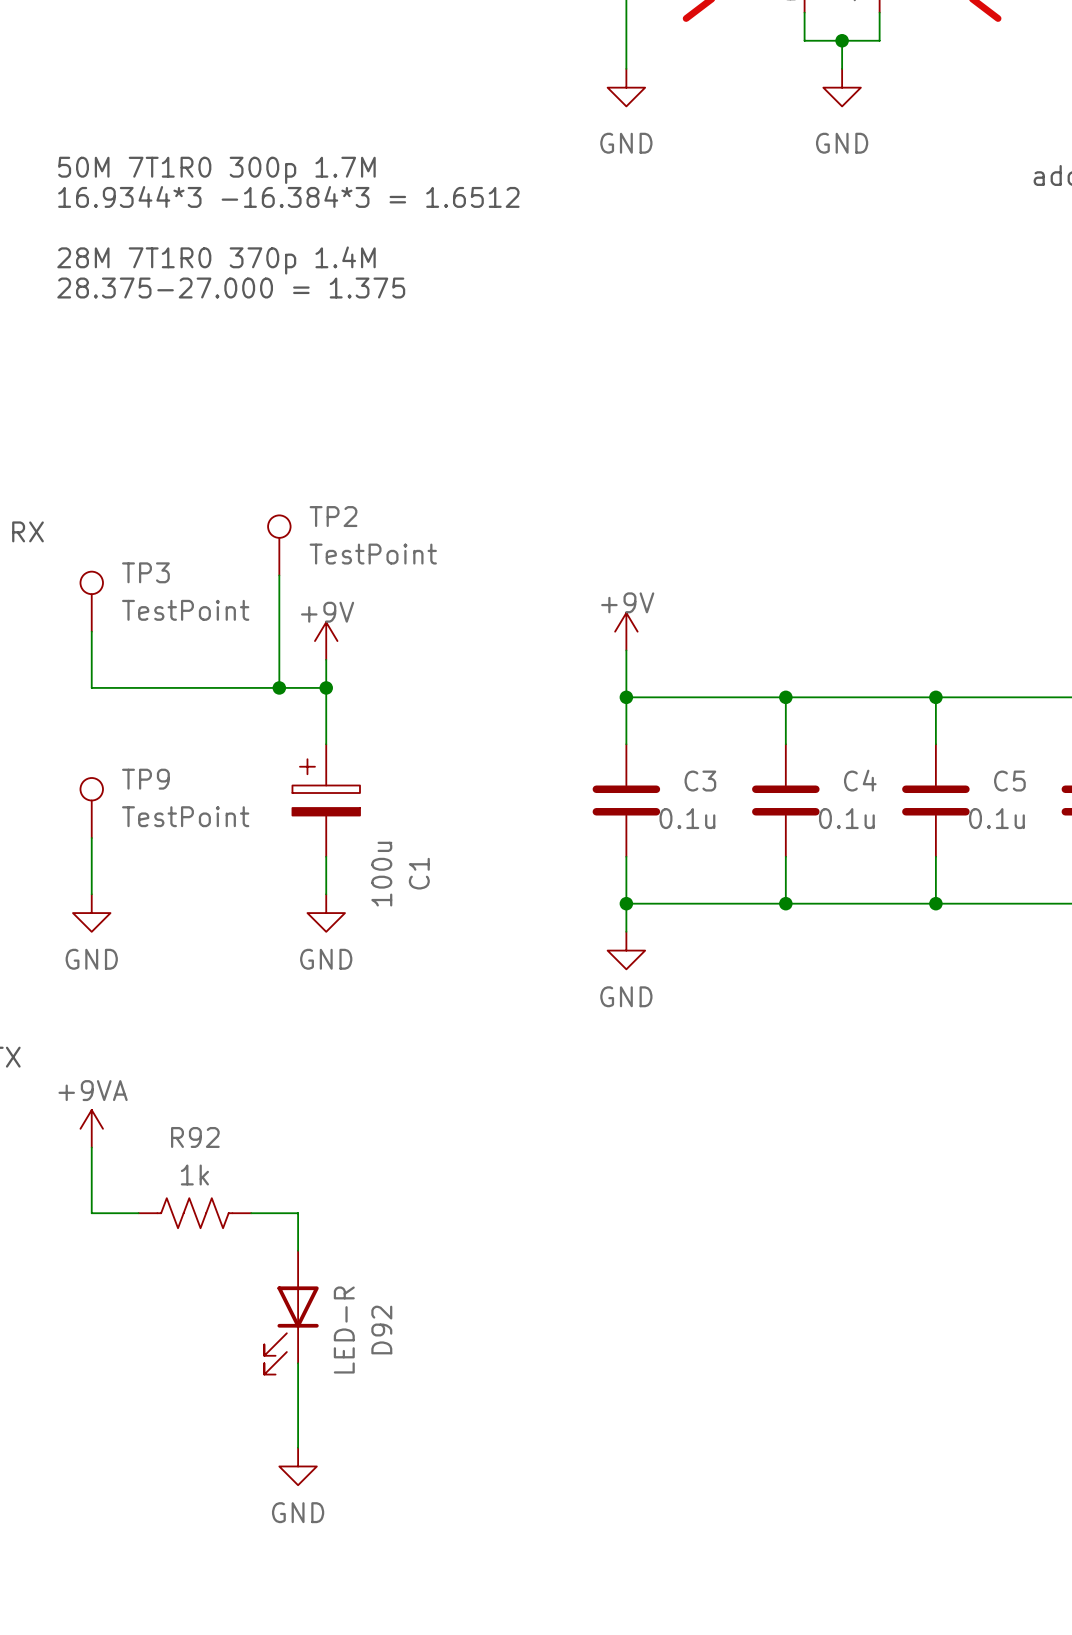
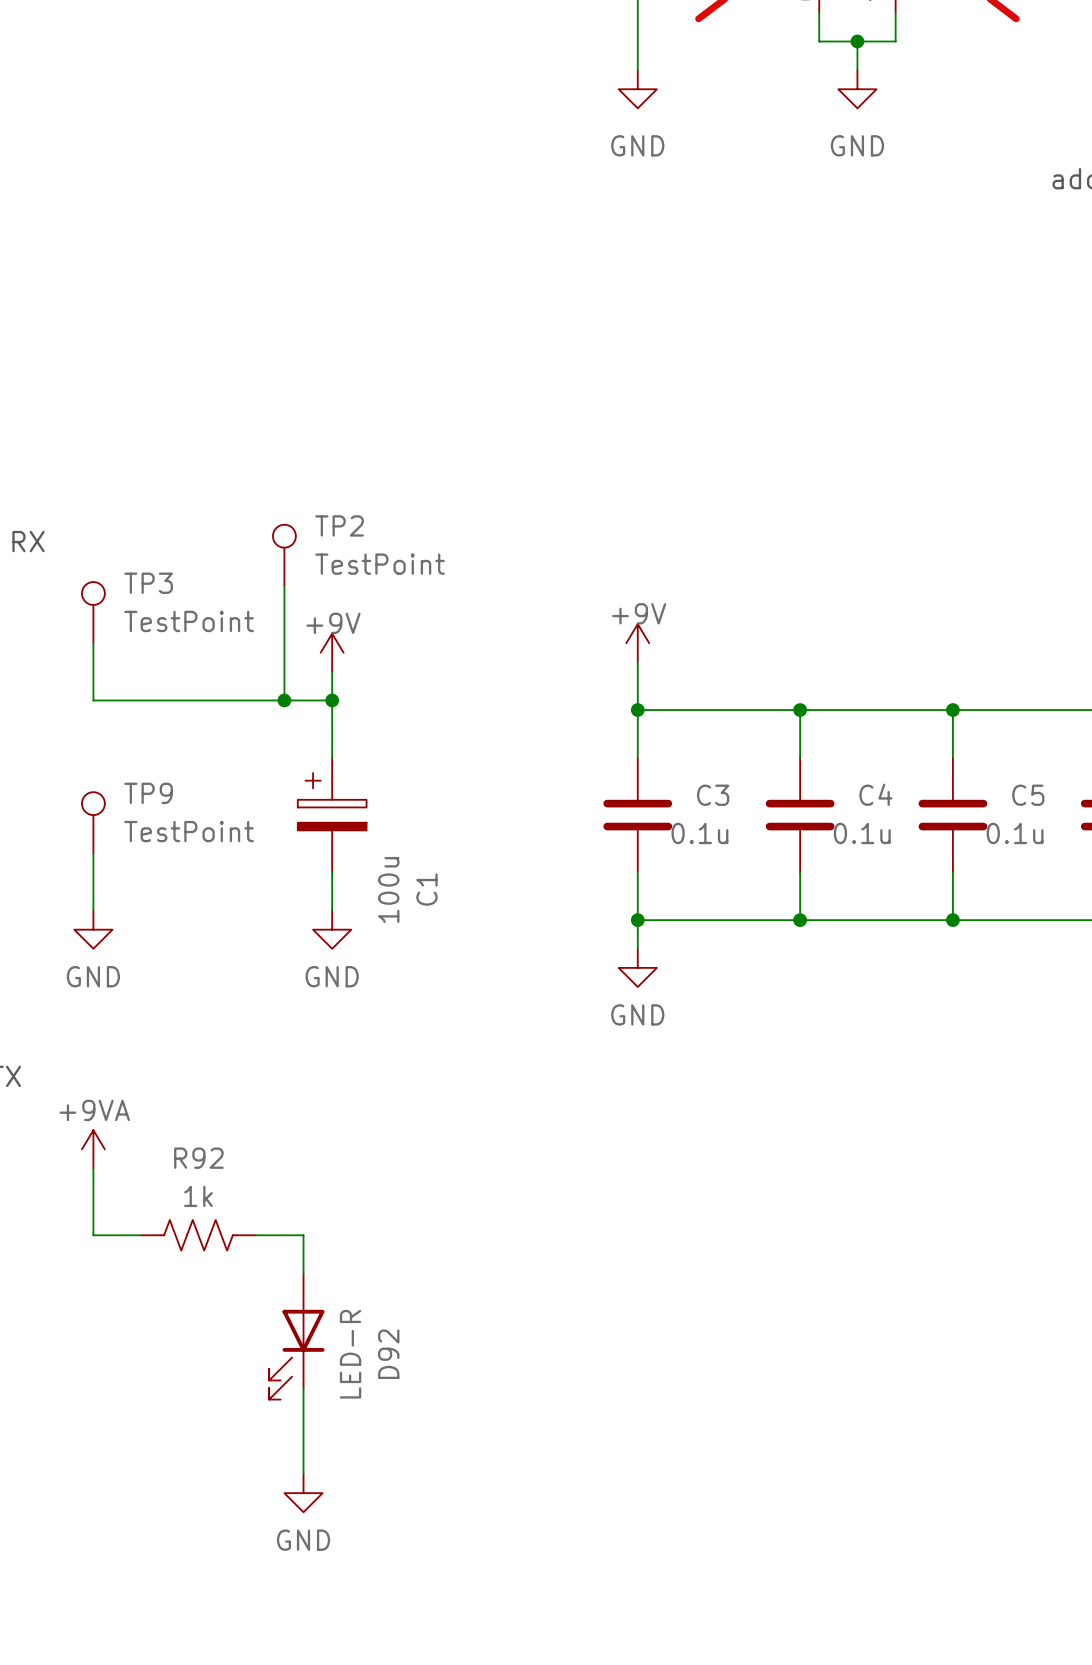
text: 50M 7T1R0 300p 1.7M (216, 170) -> none
text: 16.9344*3 -16.384*3 = 1.6512 (288, 196) -> none
text: 28M 7T1R0 370p 1.4M (216, 260) -> none
text: 28.375-27.000 = 1.375 (231, 288) -> none

